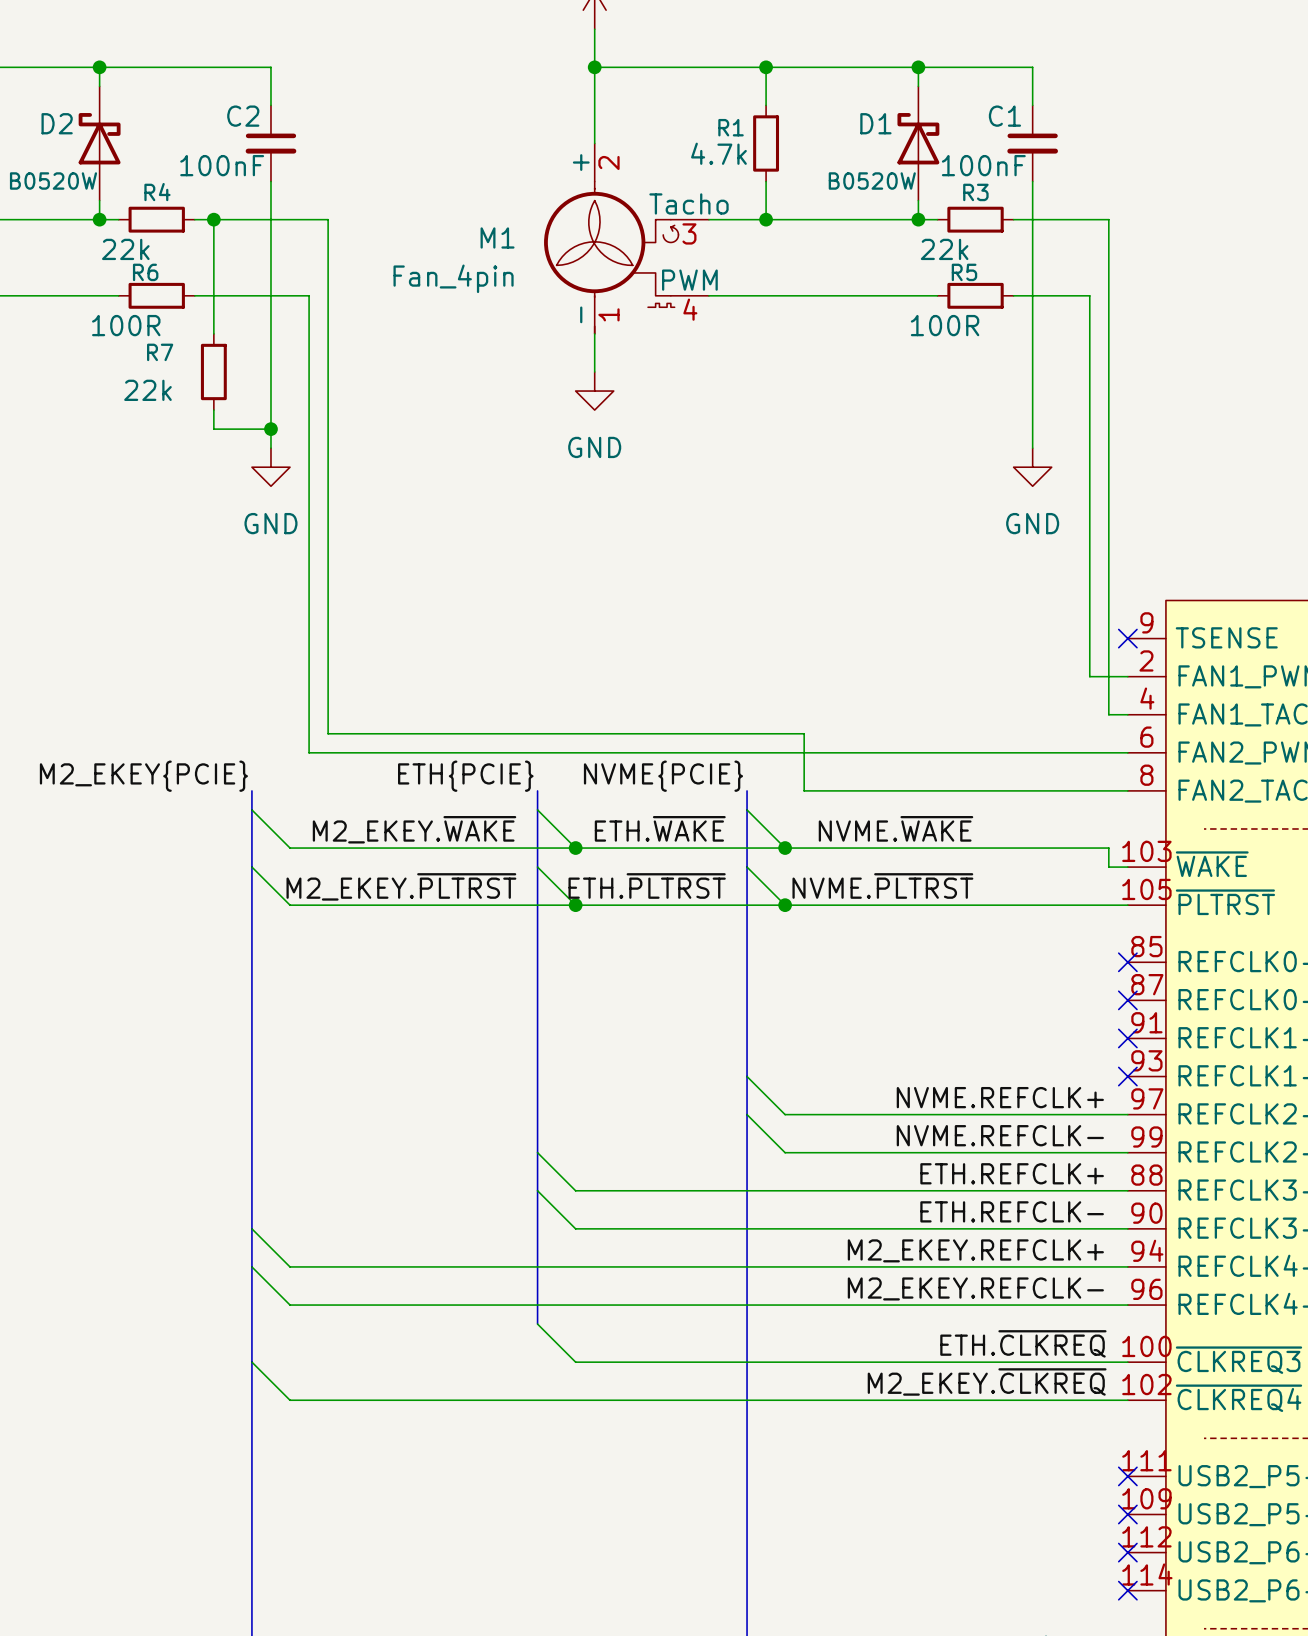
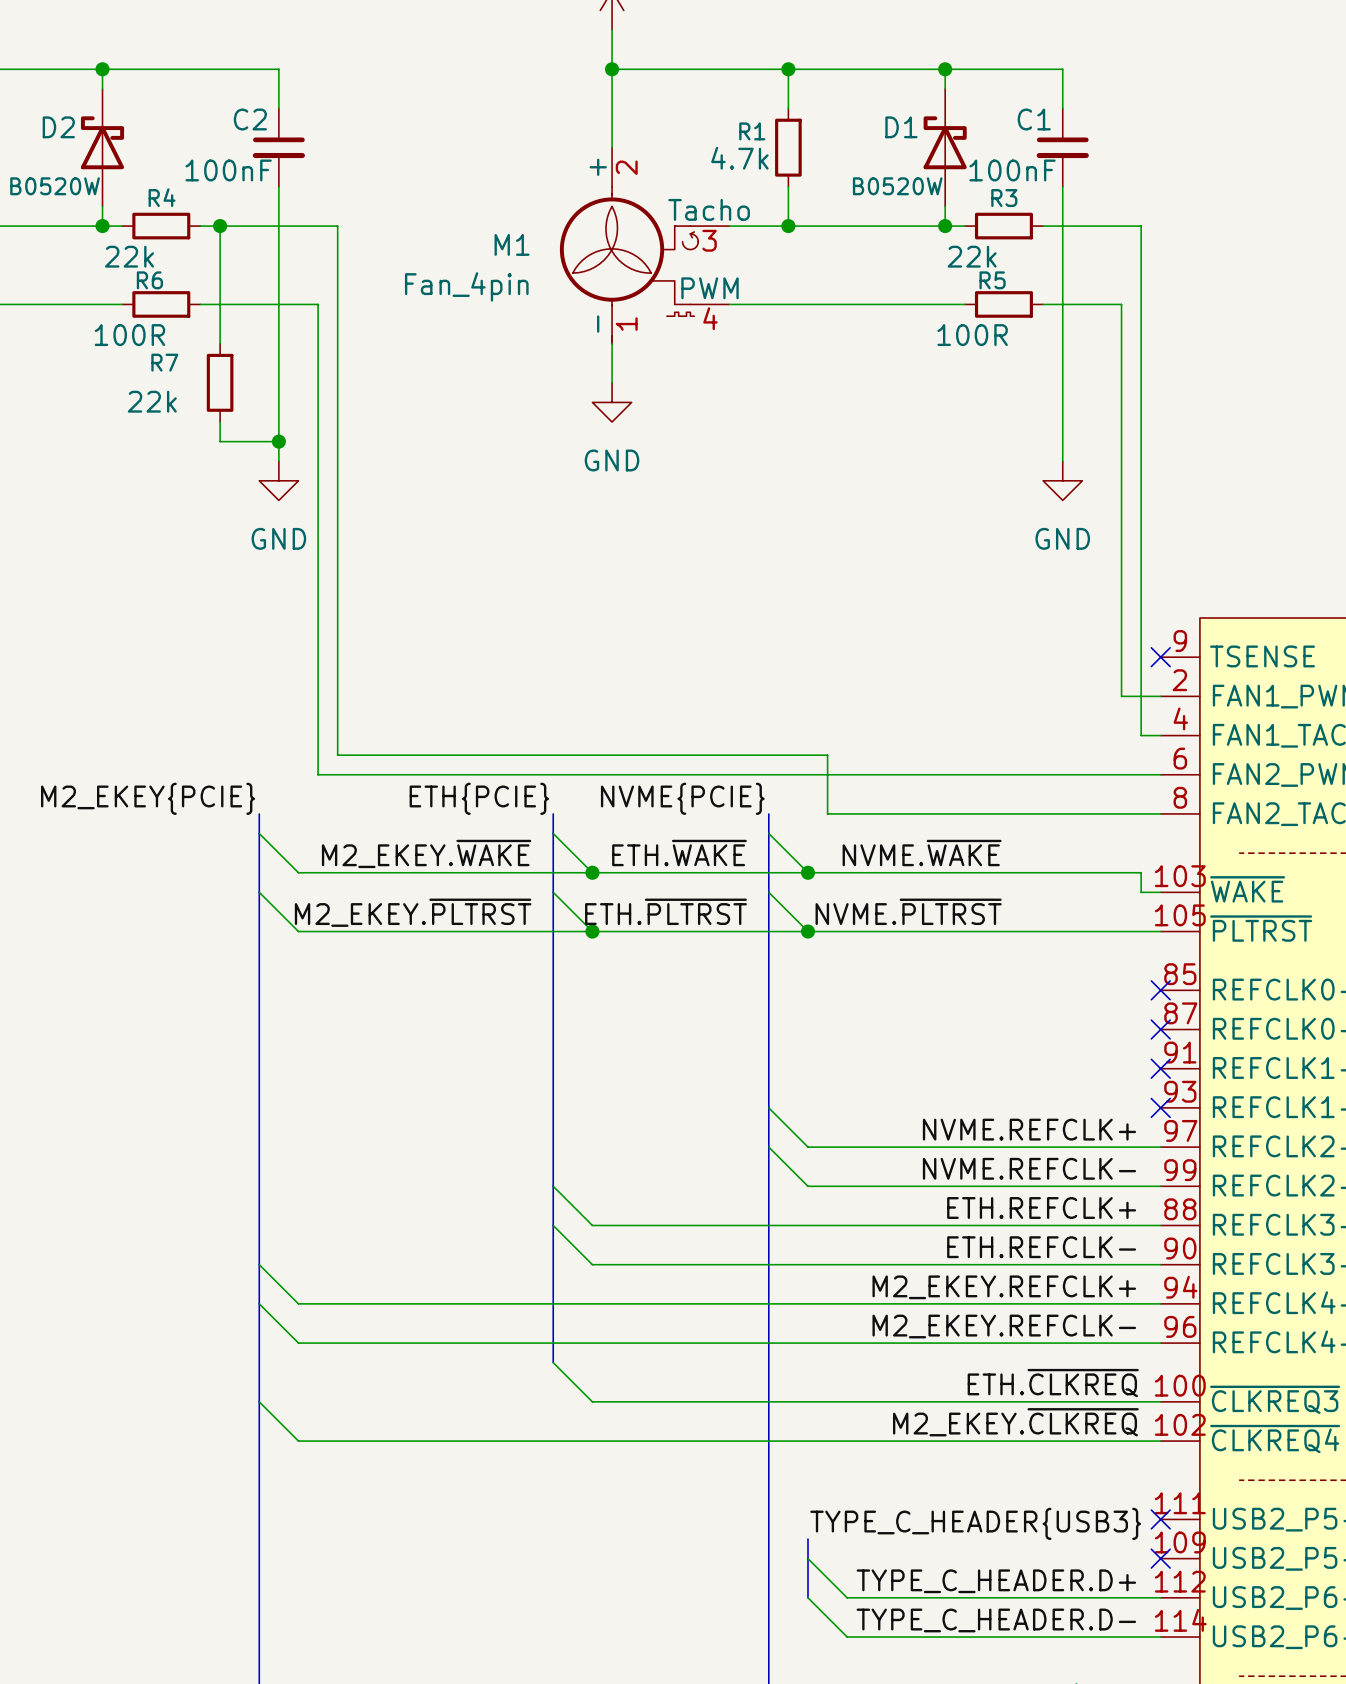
label: none -> TYPE_C_HEADER{USB3} (975, 1523)
bus: none -> (807, 1539) (807, 1597)
wire: none -> (807, 1558) (847, 1597) (1160, 1597)
label: none -> TYPE_C_HEADER.D+ (996, 1581)
wire: none -> (807, 1597) (847, 1637) (1160, 1637)
no-connect mark: (1127, 1552) -> none
label: none -> TYPE_C_HEADER.D- (996, 1620)
no-connect mark: (1127, 1590) -> none

